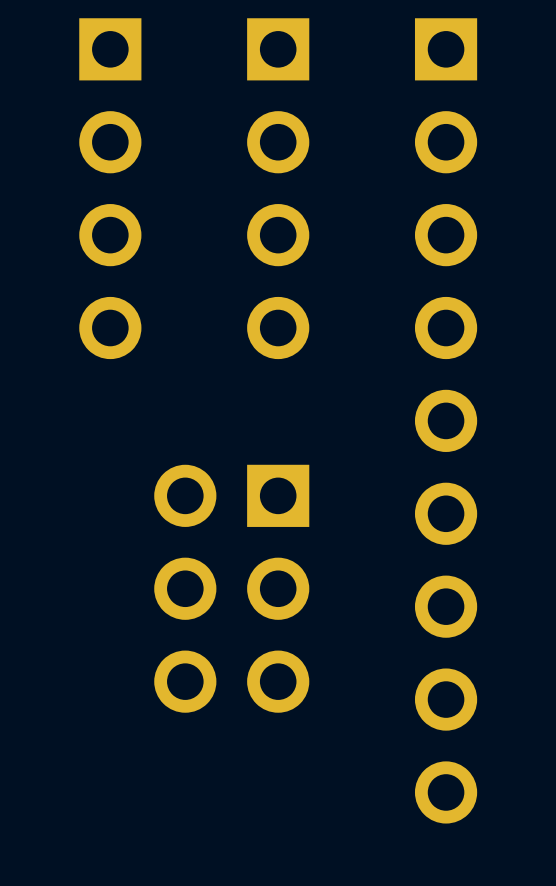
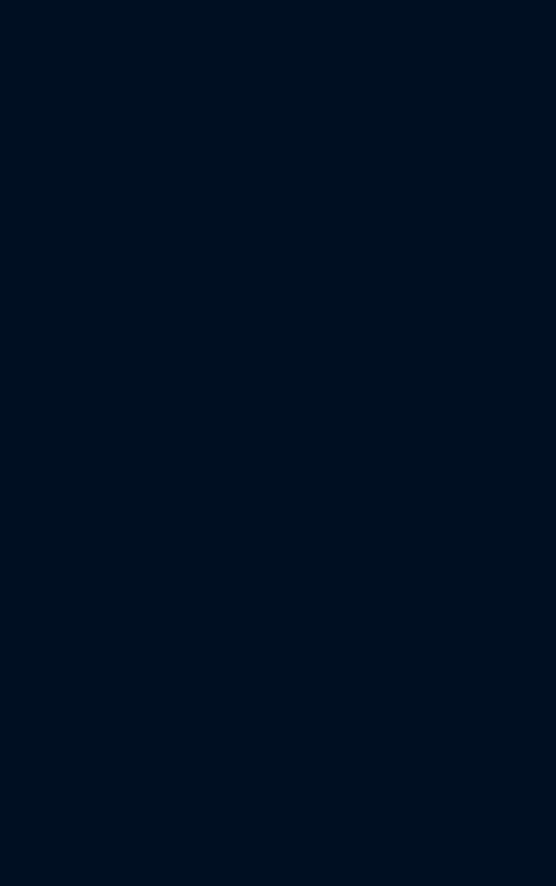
part: (110, 188) -> none
part: (278, 188) -> none
part: (446, 420) -> none
part: (231, 588) -> none

